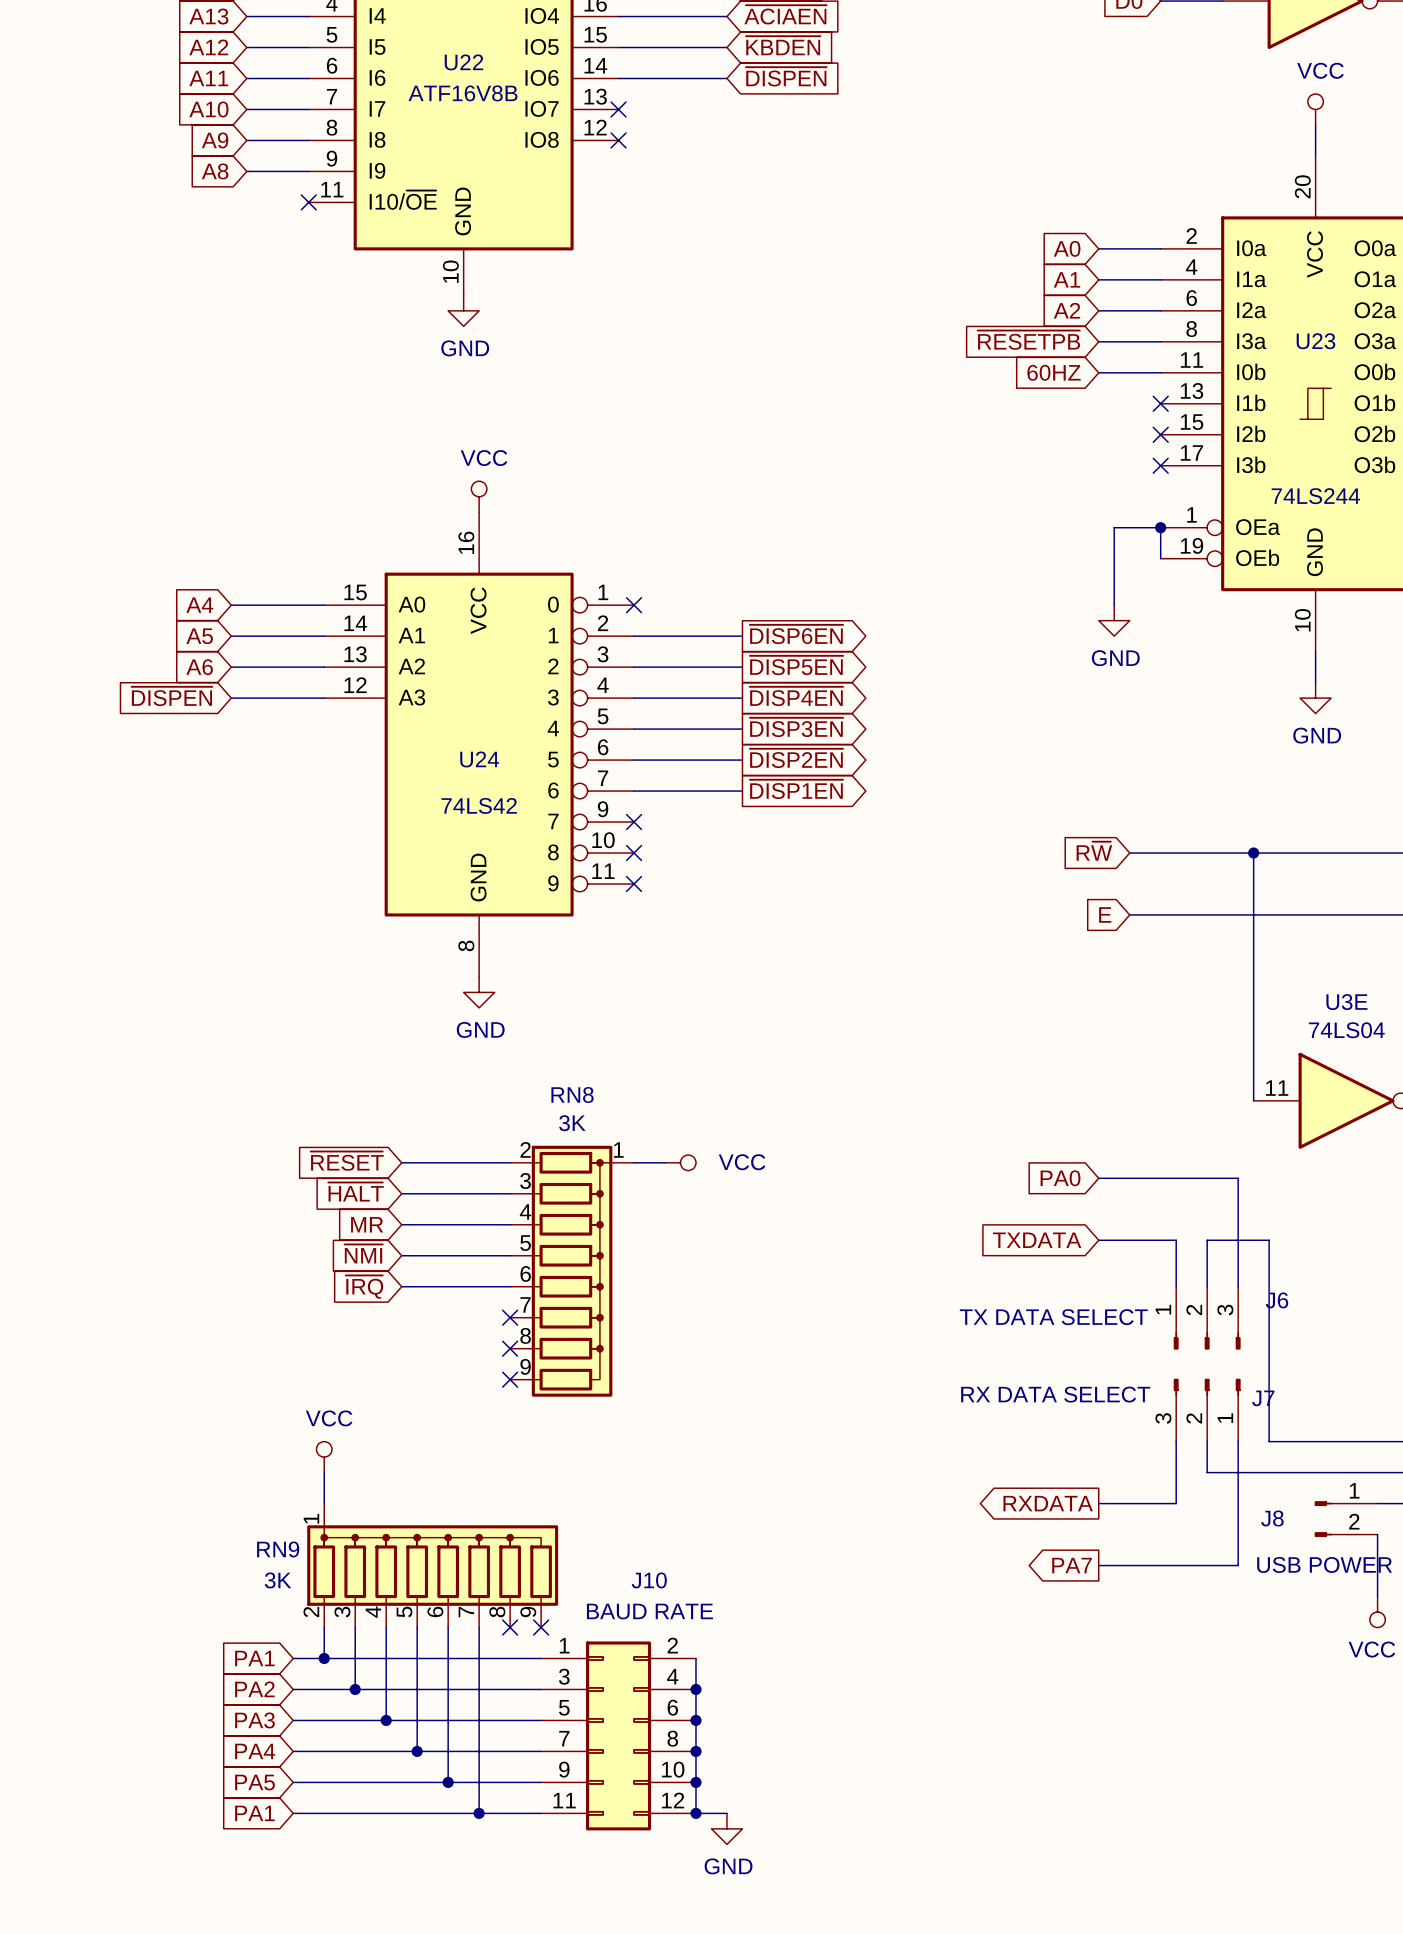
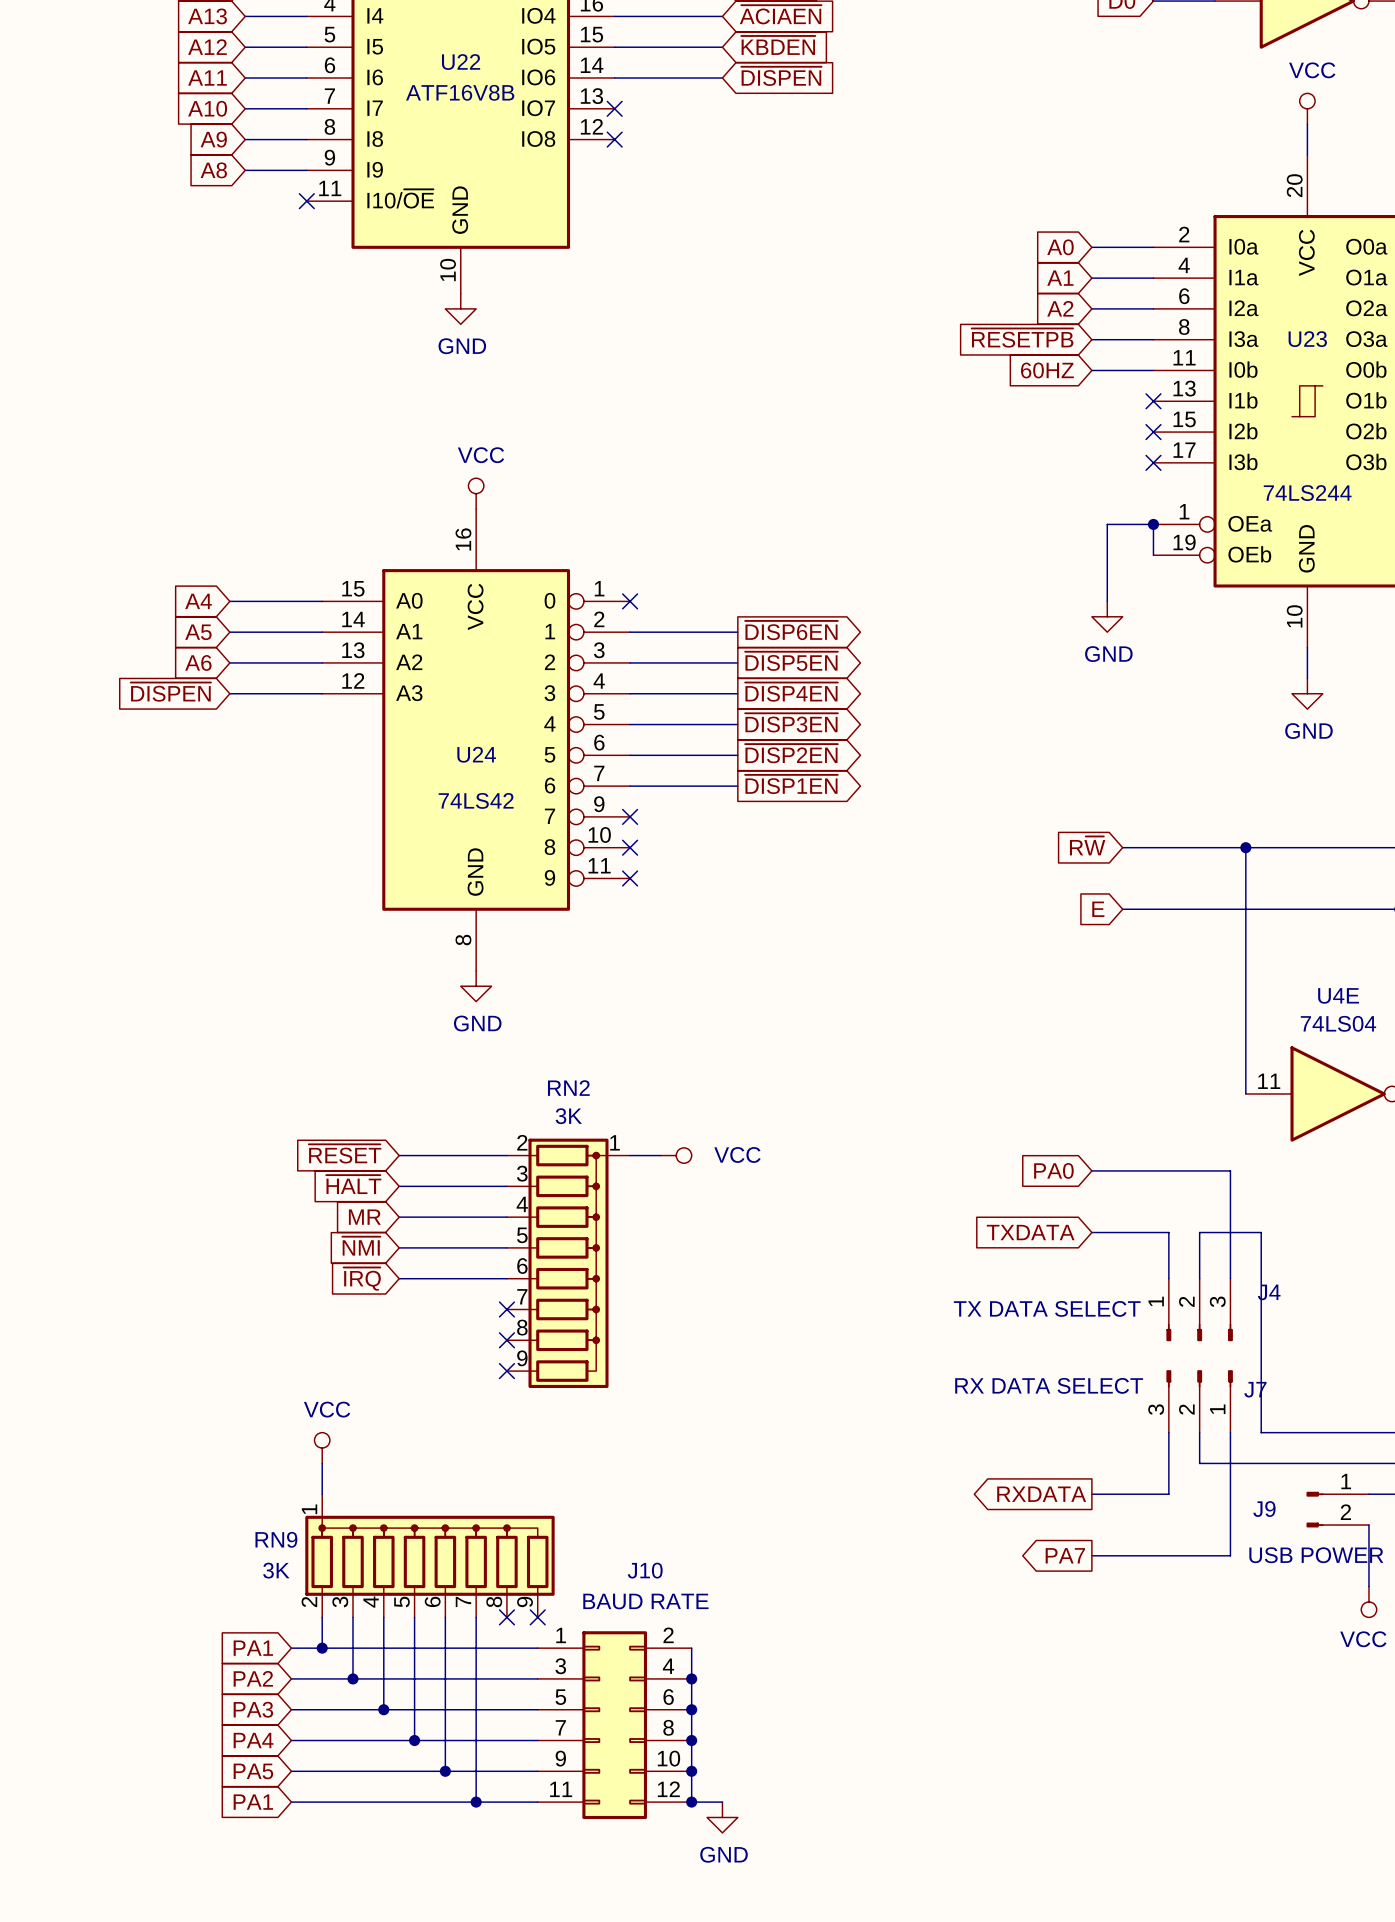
U3E name: U3E (1346, 1002) -> U4E (1338, 995)
RN8 name: RN8 (572, 1094) -> RN2 (568, 1088)
J6 name: J6 (1276, 1300) -> J4 (1269, 1292)
J8 name: J8 (1272, 1518) -> J9 (1264, 1509)

